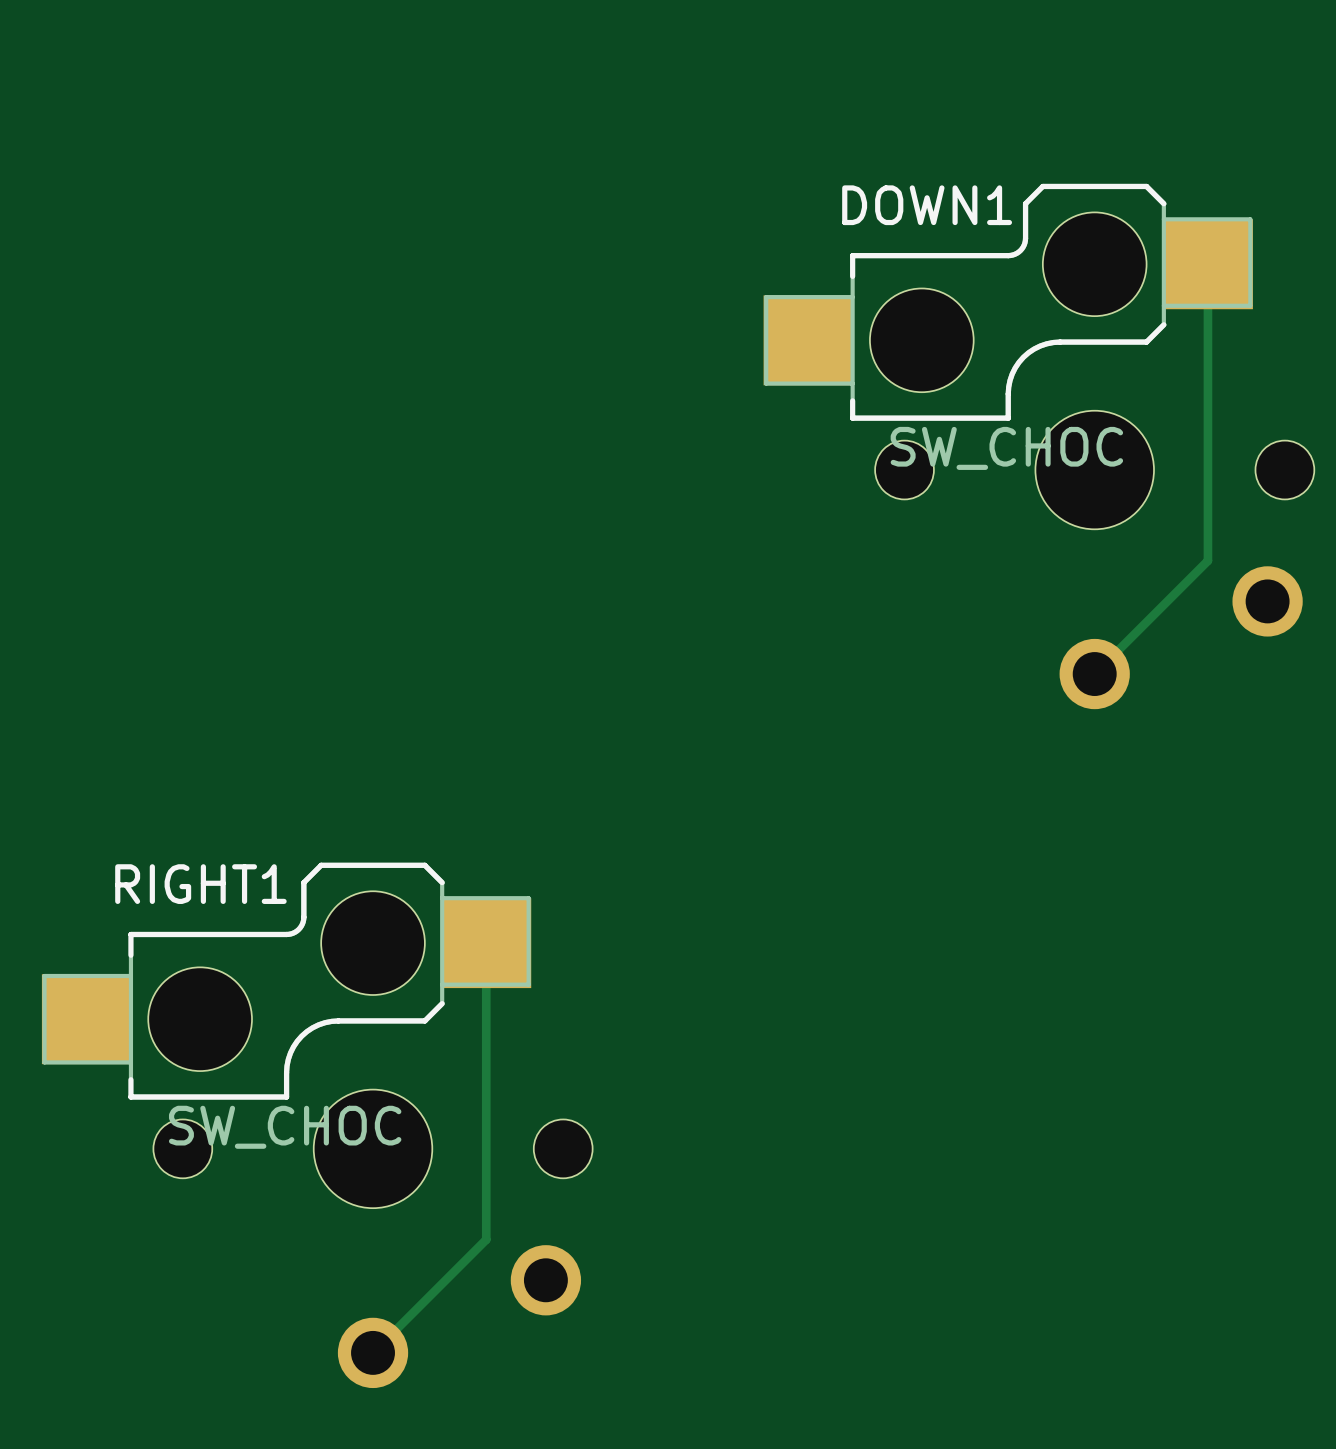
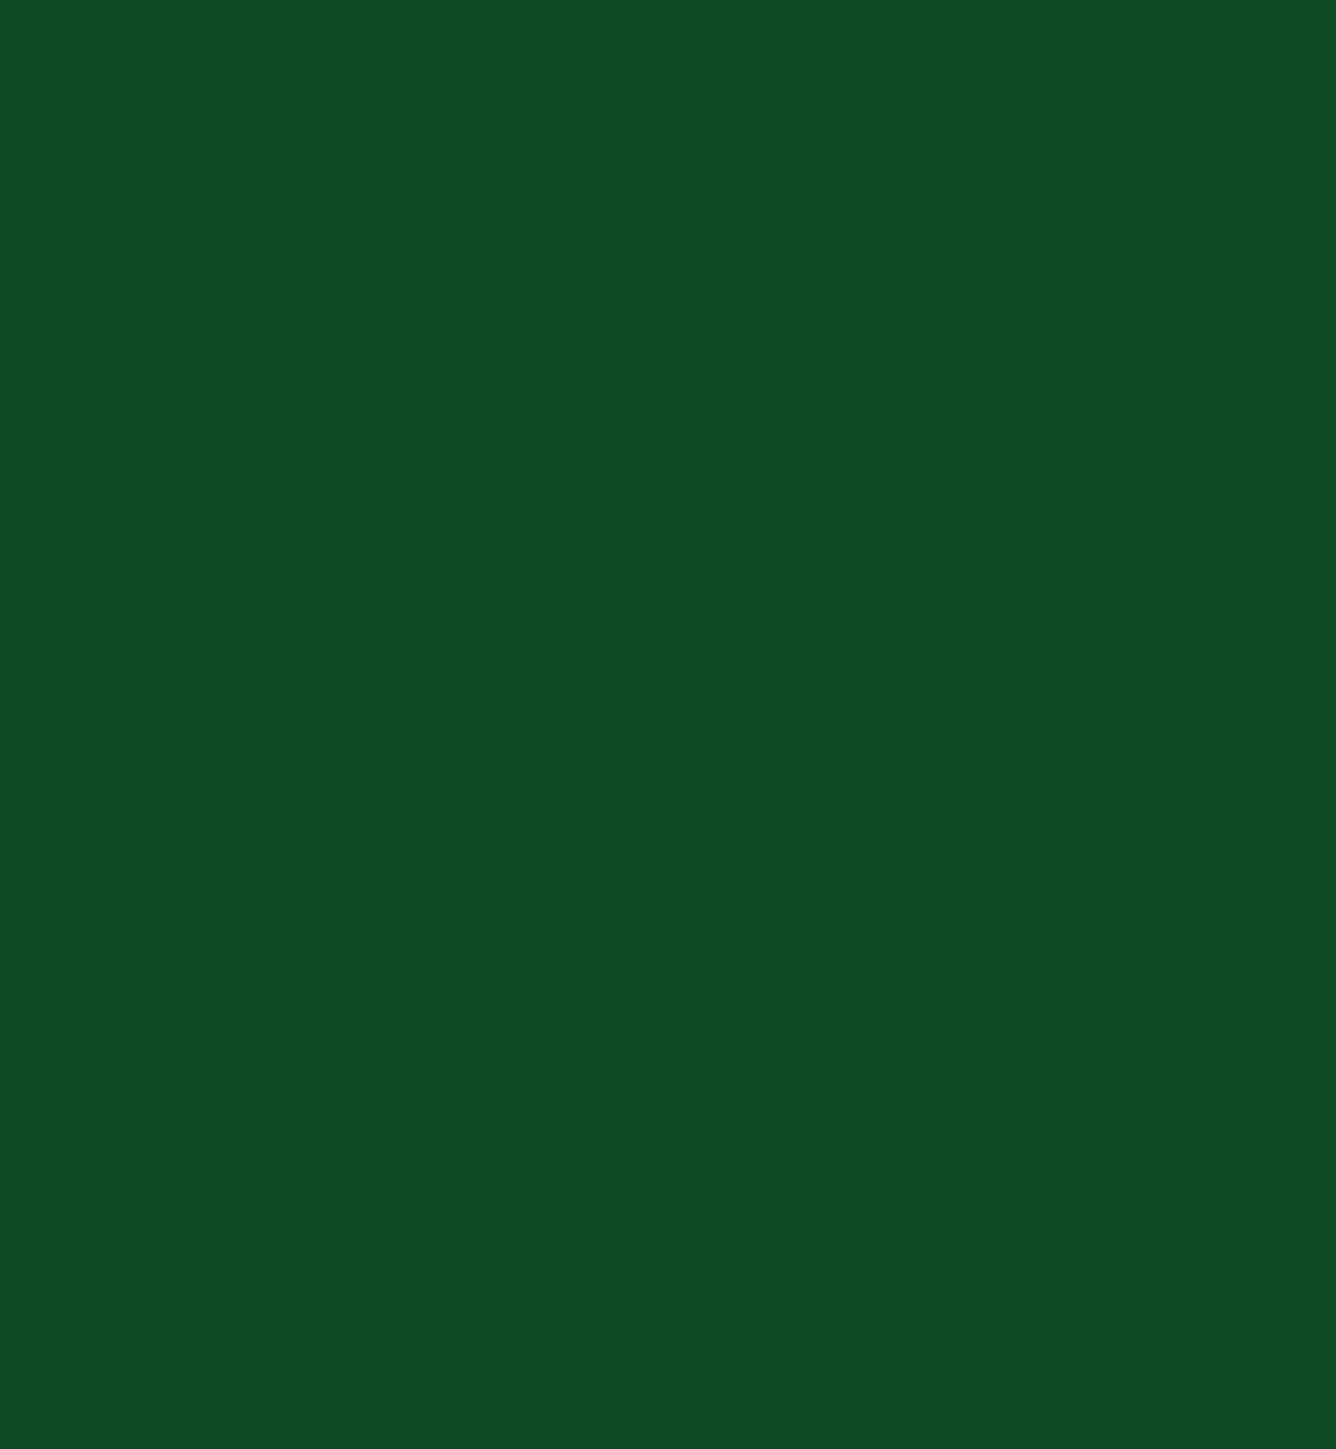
track: (1207, 264) (1207, 560) (1094, 674) -> none
DOWN1: SW_CHOC (1038, 446) -> none
track: (486, 943) (486, 1239) (373, 1352) -> none
RIGHT1: SW_CHOC (317, 1125) -> none

